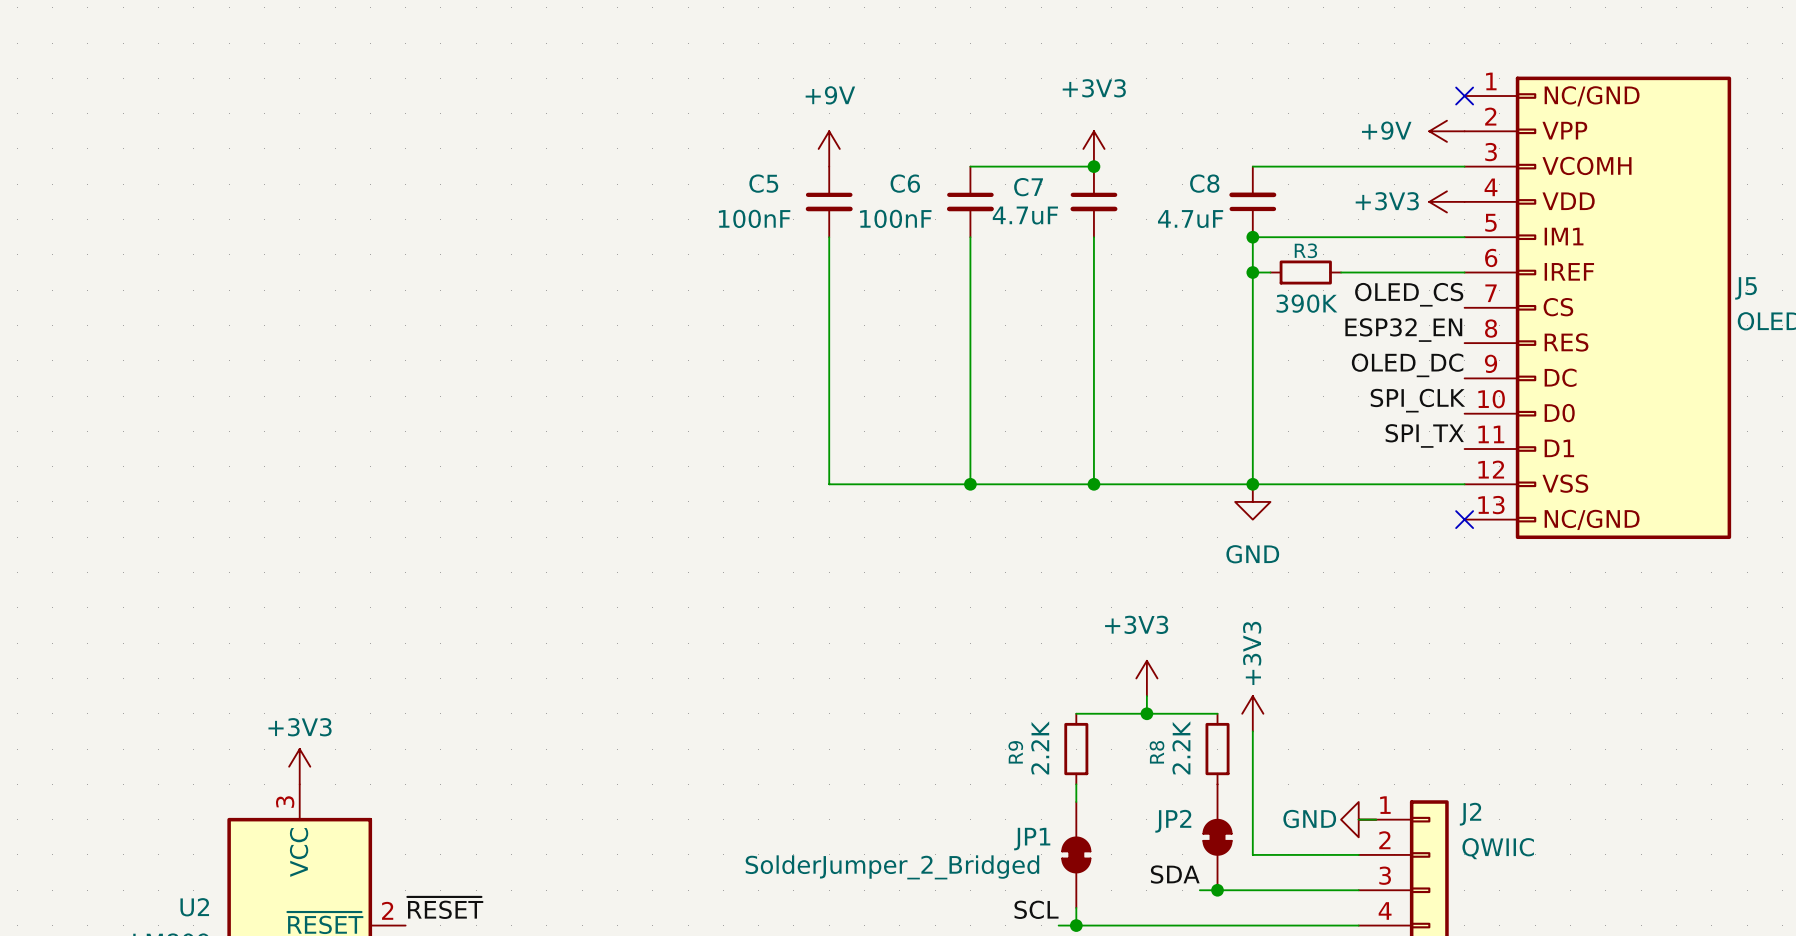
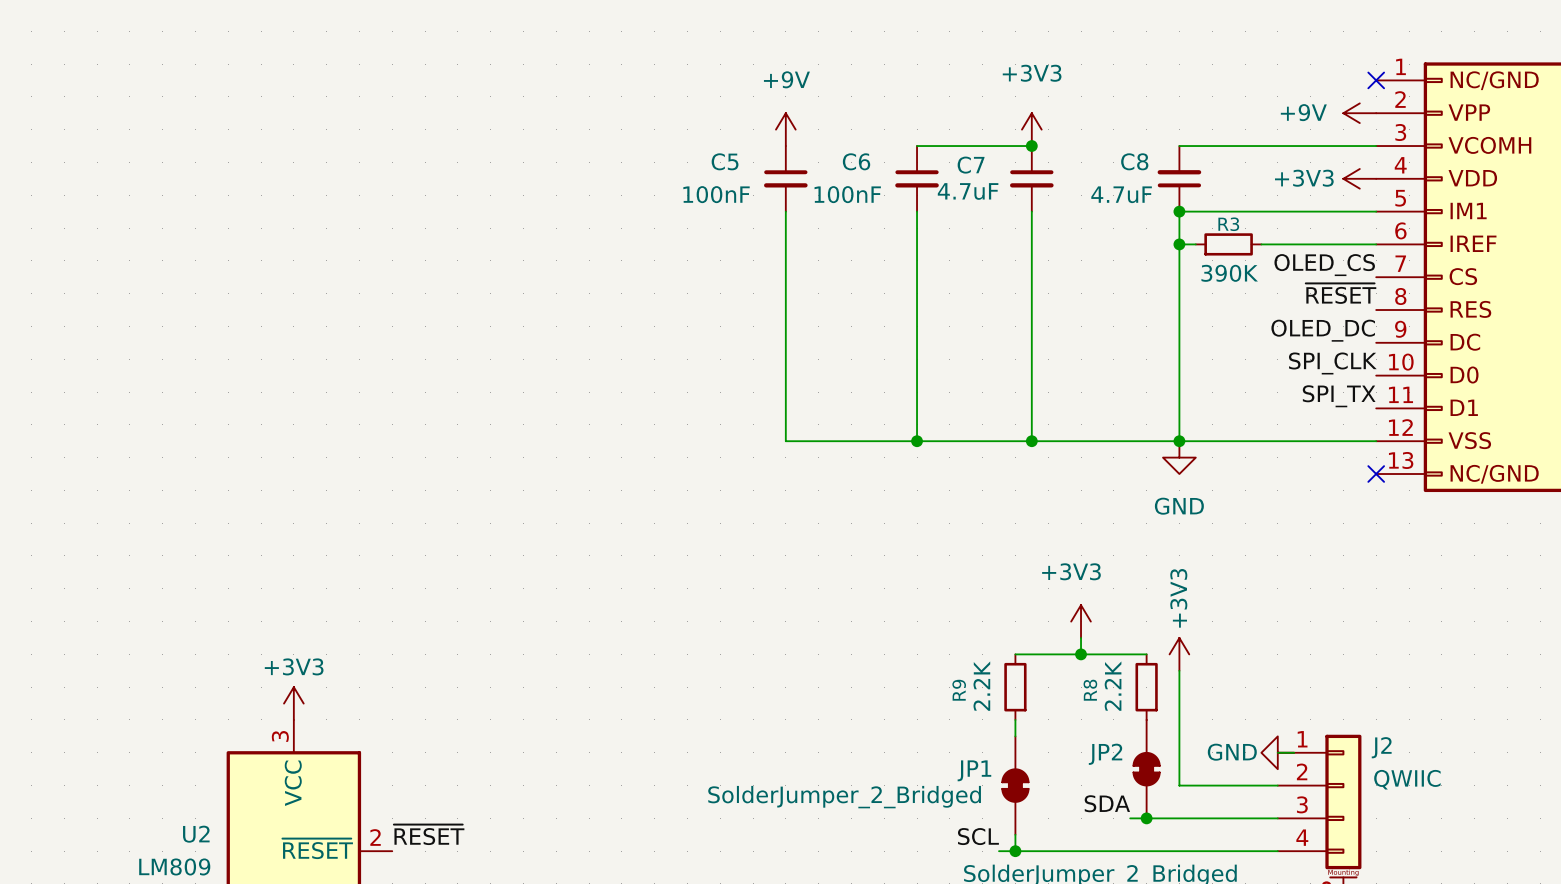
label: ESP32_EN (1403, 330) -> ~{RESET} (1341, 293)

